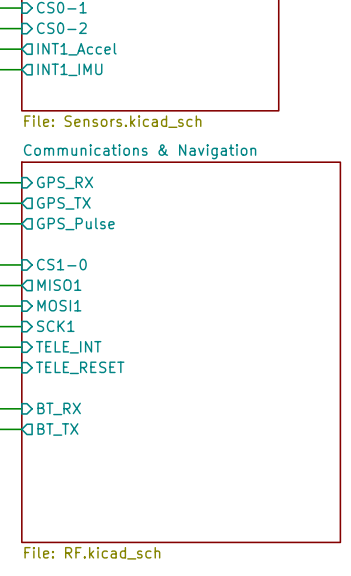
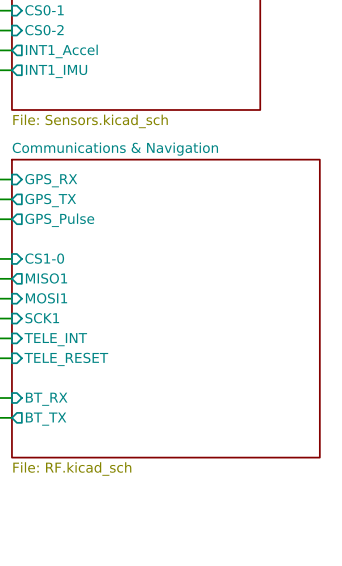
sheet Communications & Navigation: none -> File: RF.kicad_sch (165, 308)
sheet Communications & Navigation: File: RF.kicad_sch (181, 352) -> none

